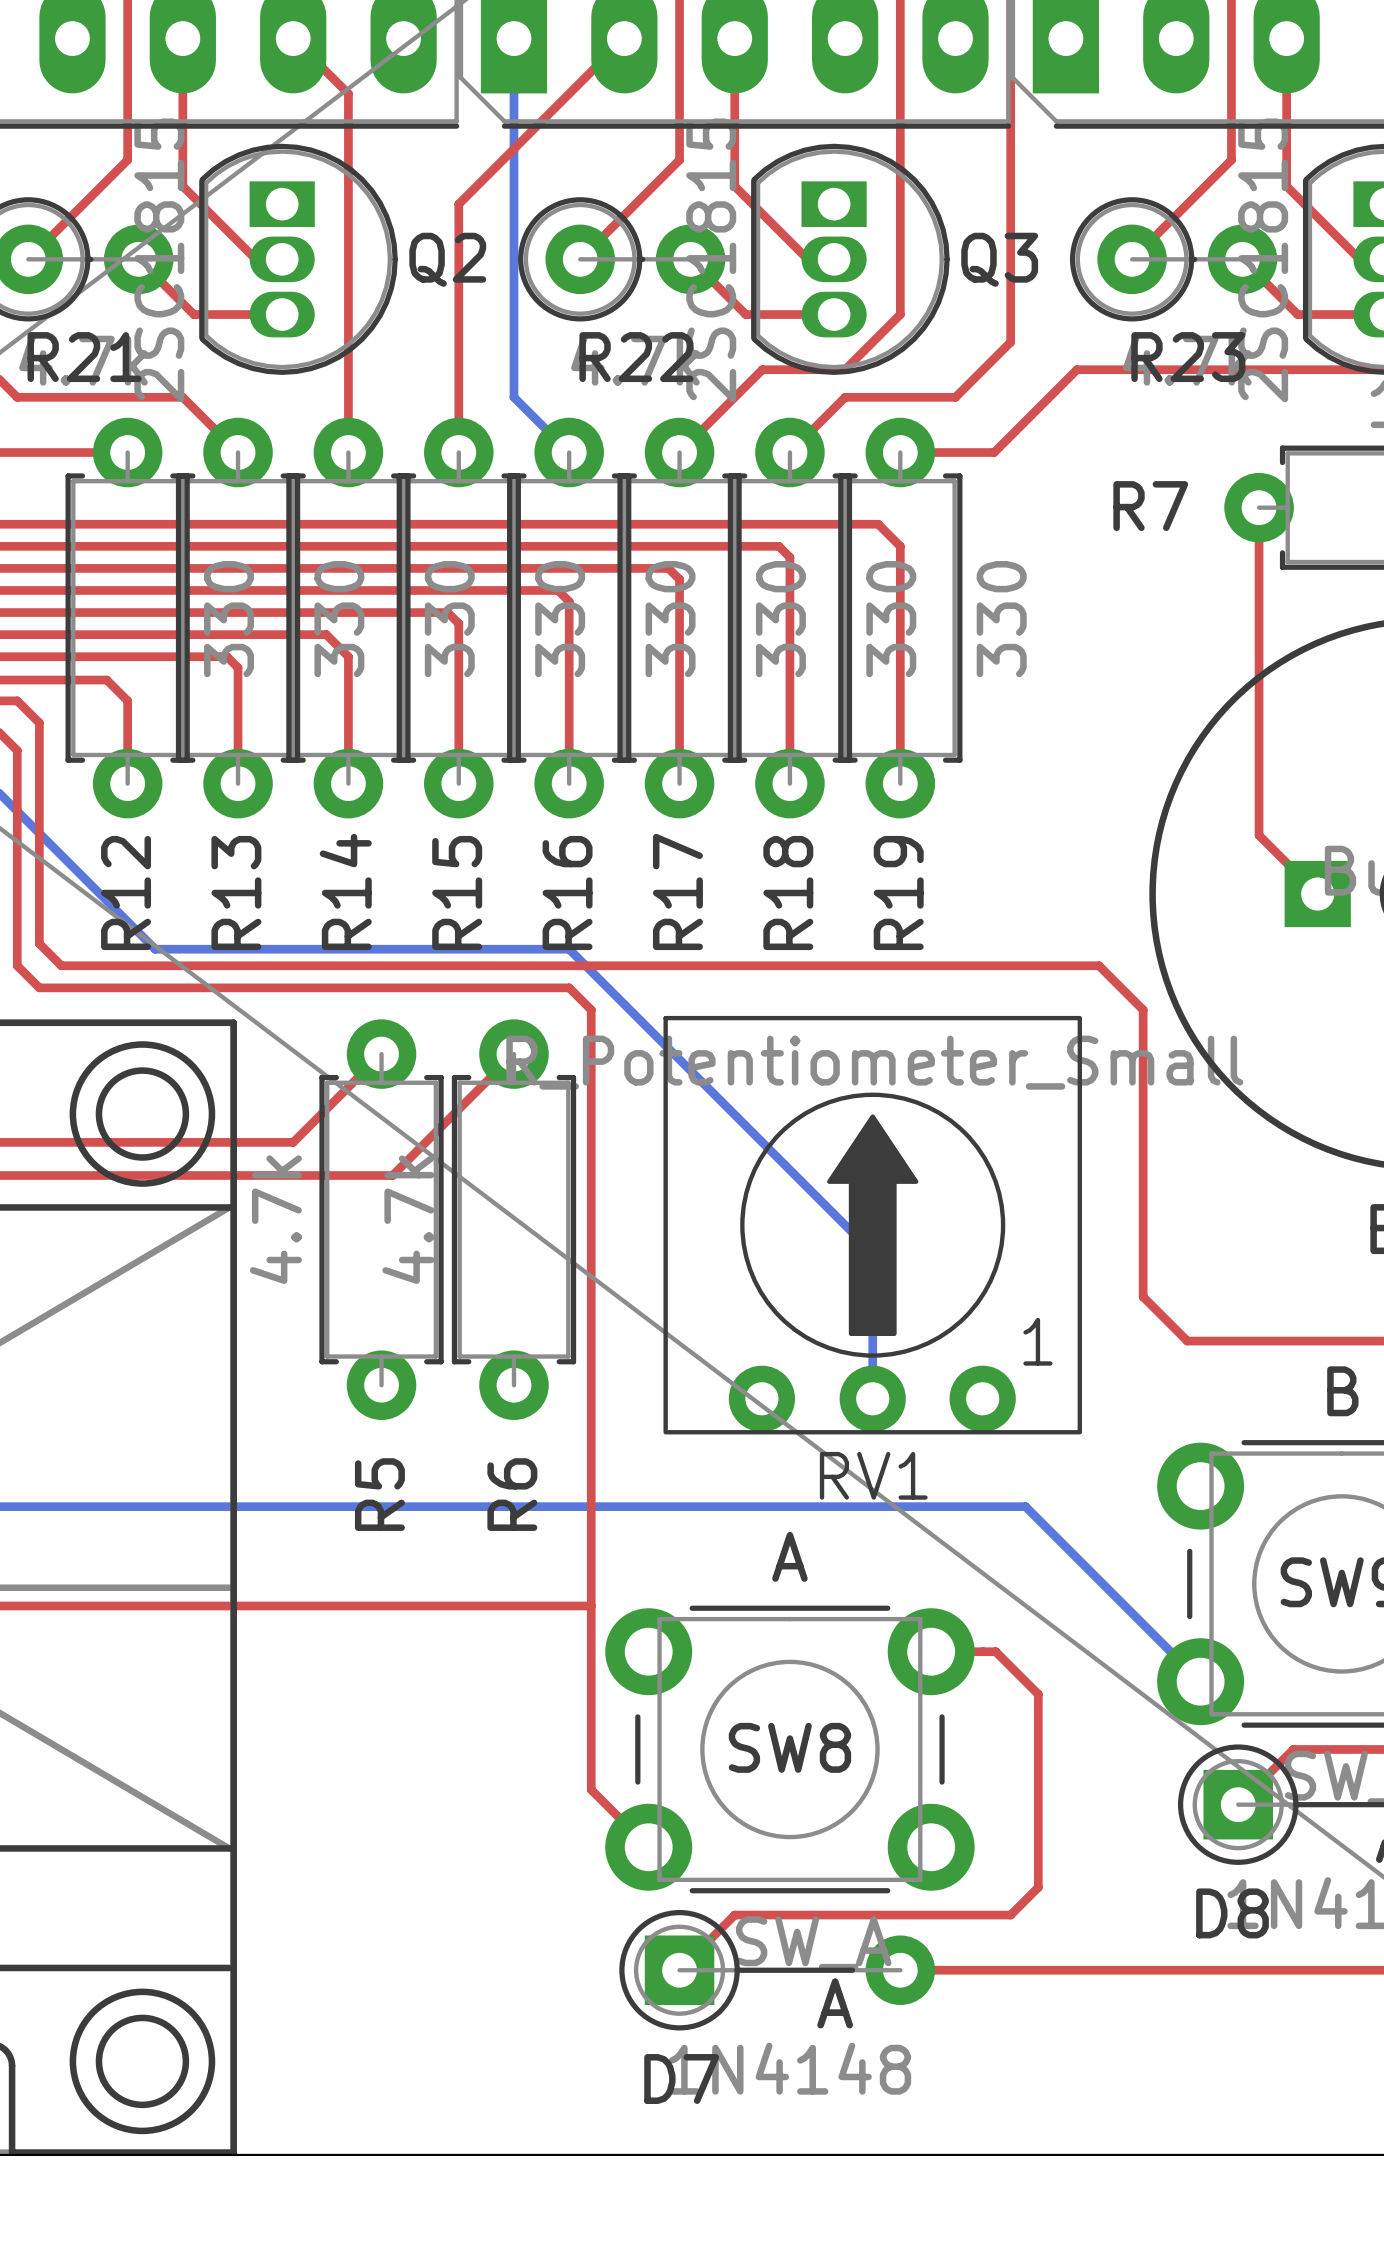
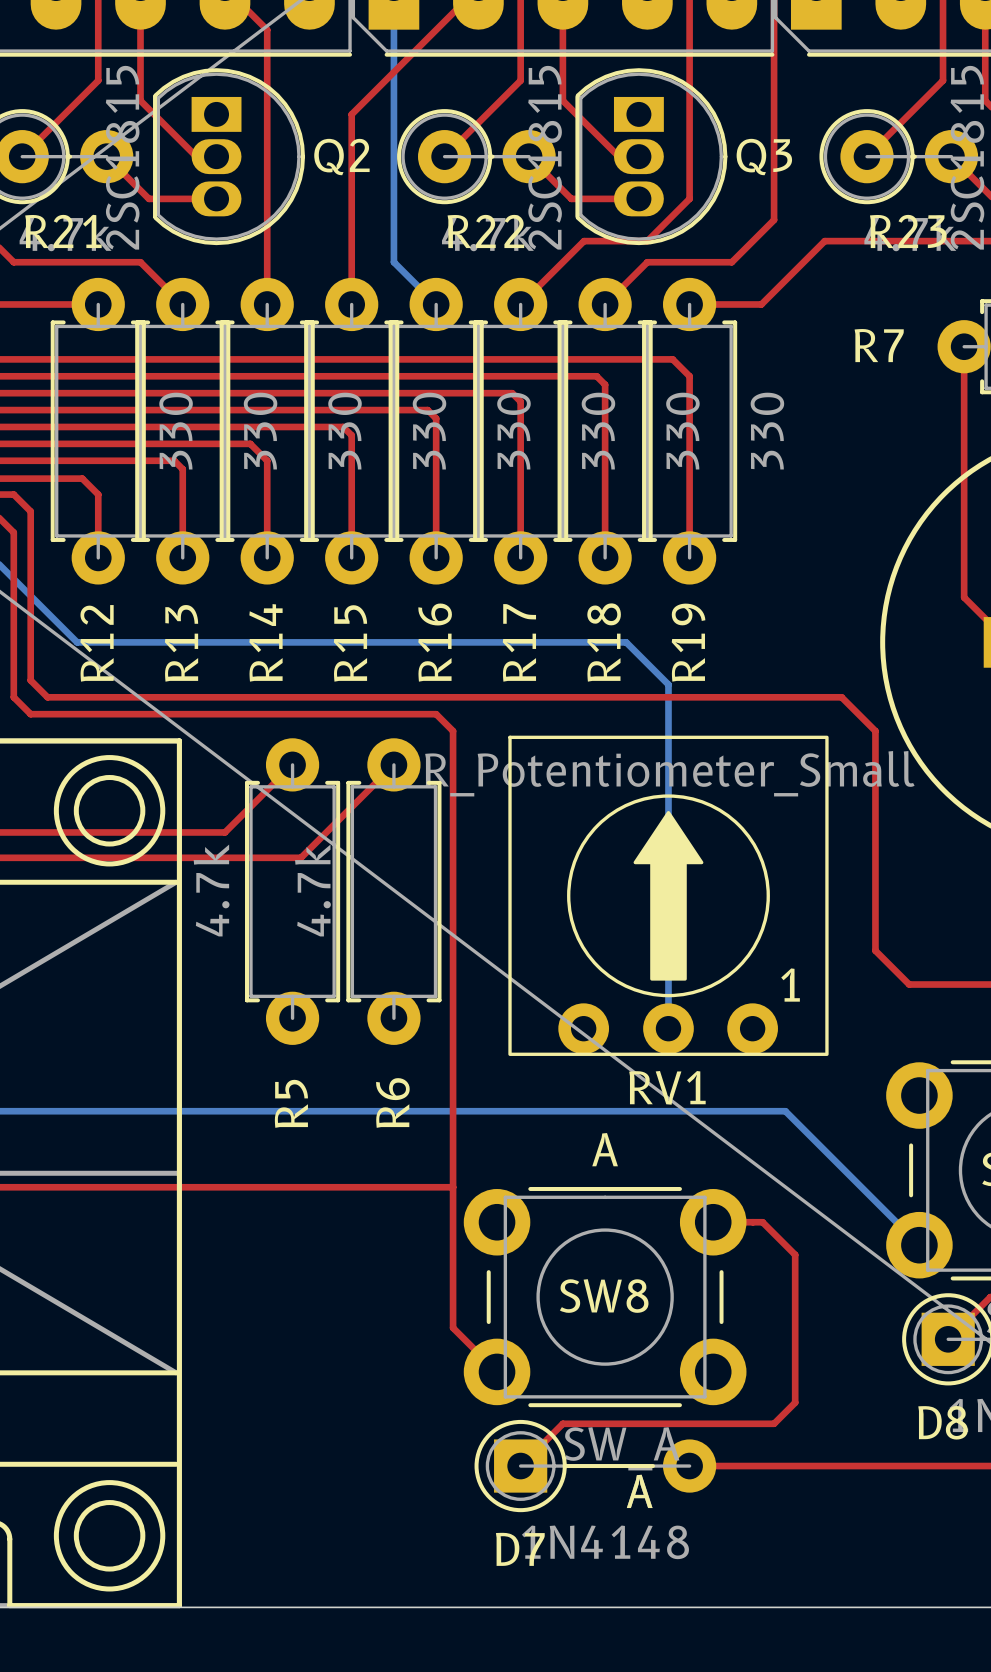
bottom track: (100, 894) (155, 949) (569, 949) (872, 1252) -> (77, 642) (626, 642) (668, 684) (668, 916)

